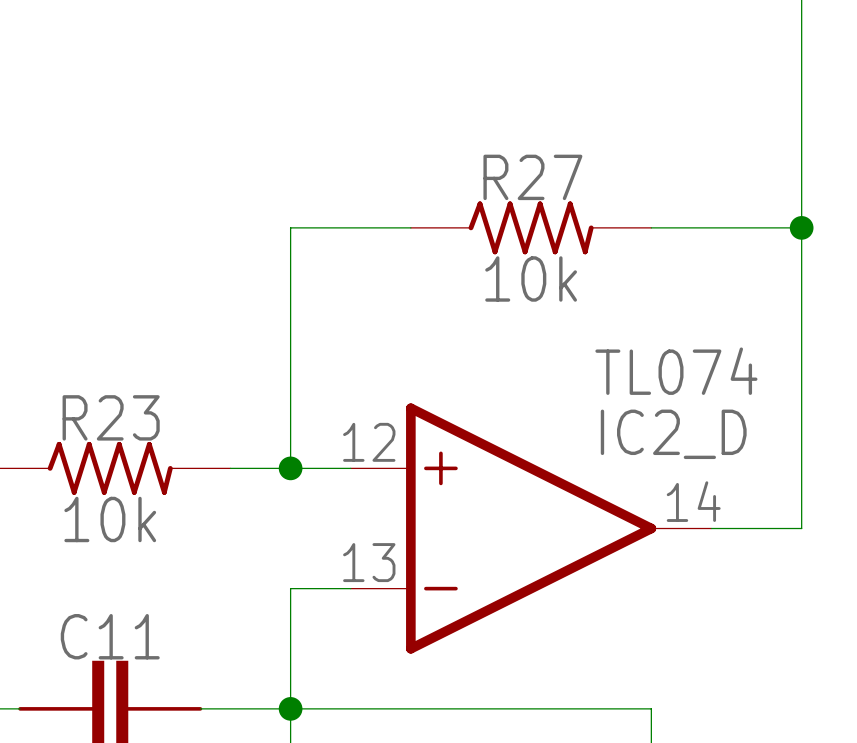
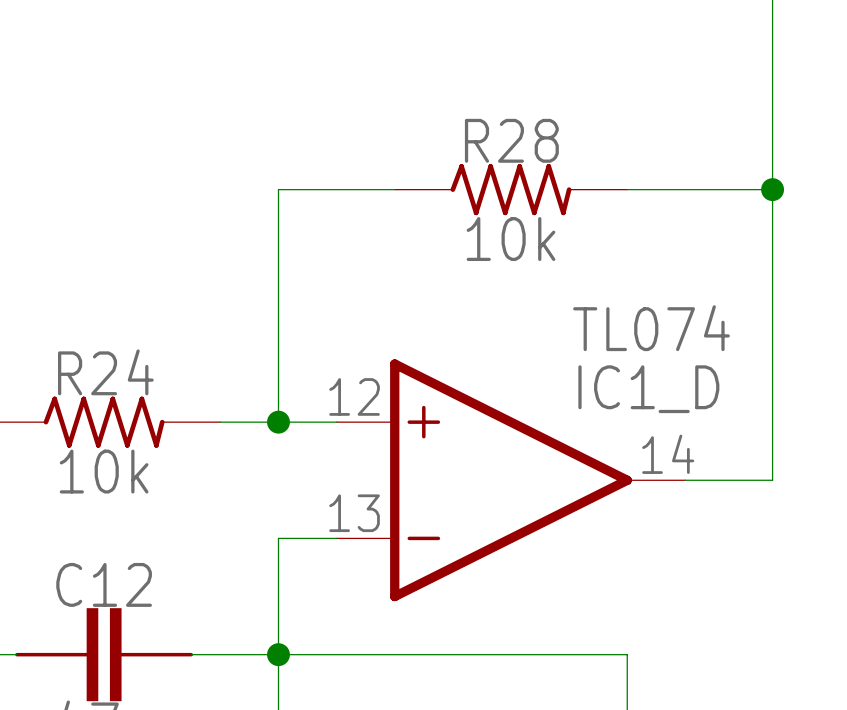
R27 name: R27 (532, 177) -> R28 (511, 140)
R23 name: R23 (111, 417) -> R24 (105, 372)
IC2_D name: IC2_D (673, 434) -> IC1_D (648, 389)
C11 name: C11 (110, 636) -> C12 (104, 584)

